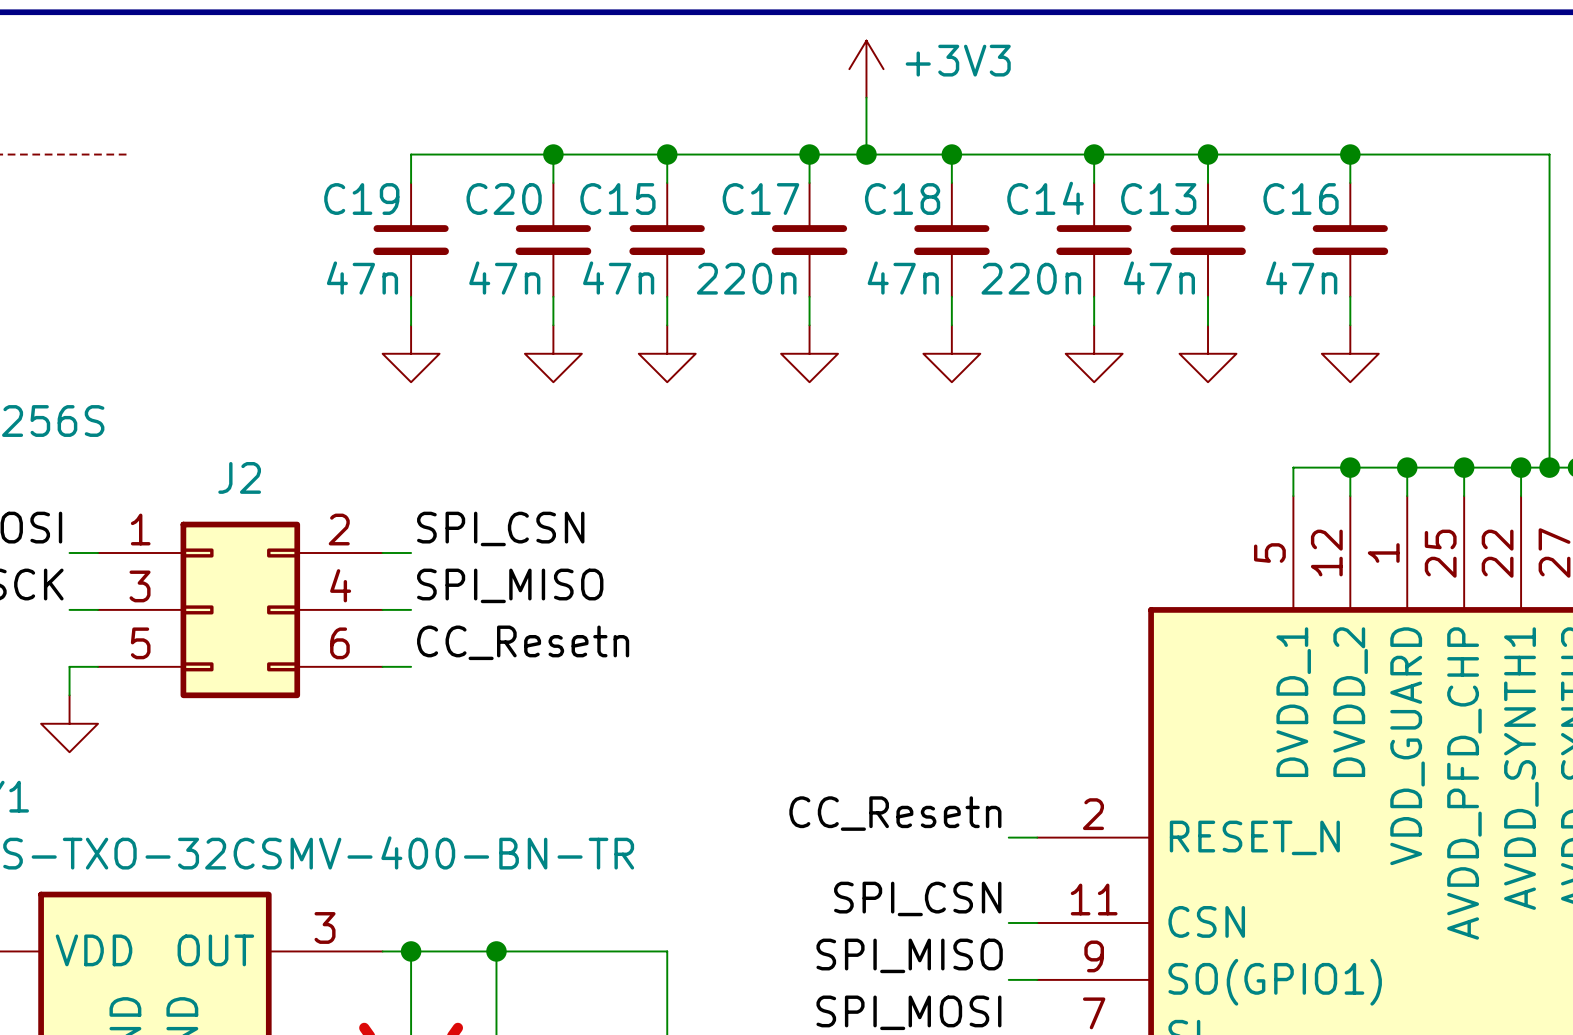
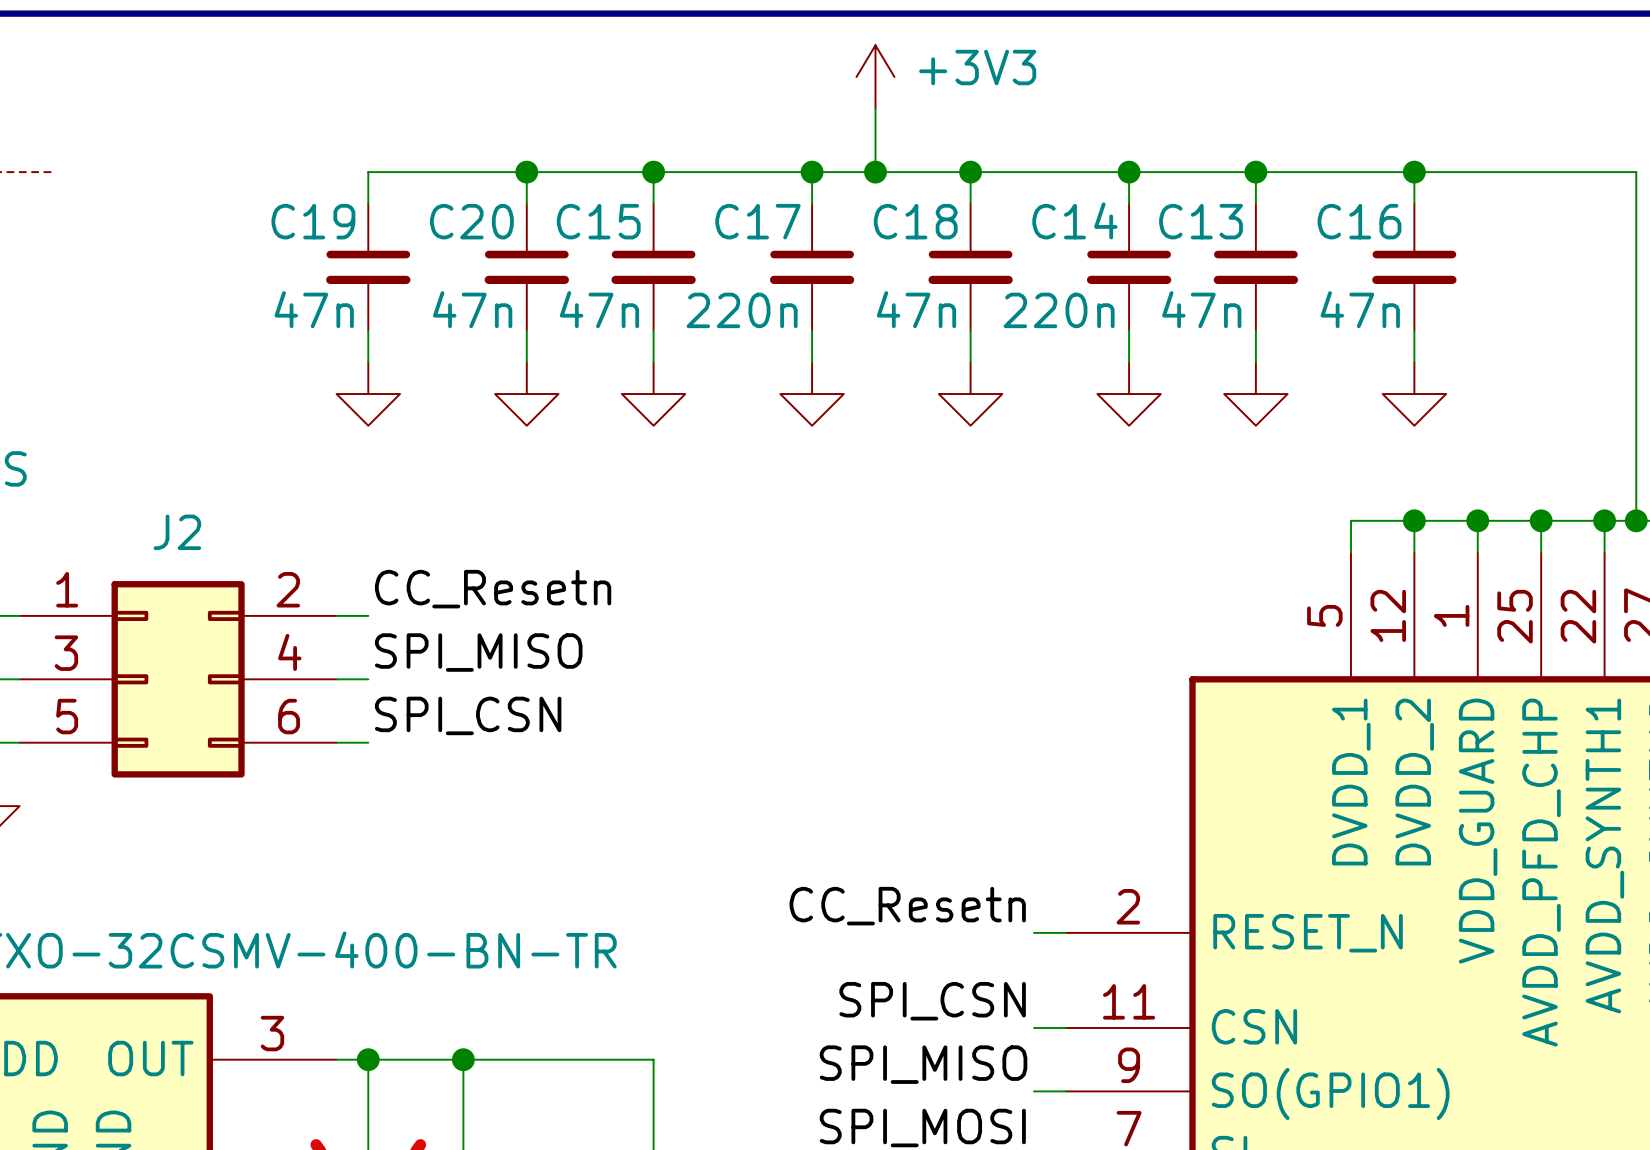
label: SPI_CSN (500, 528) -> CC_Resetn (493, 589)
label: CC_Resetn (523, 642) -> SPI_CSN (468, 715)

